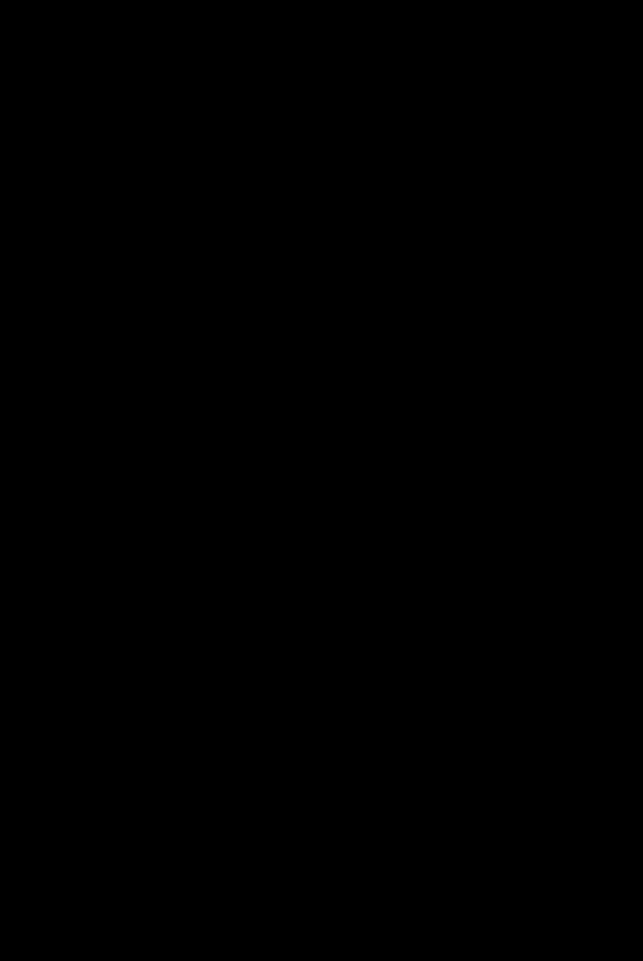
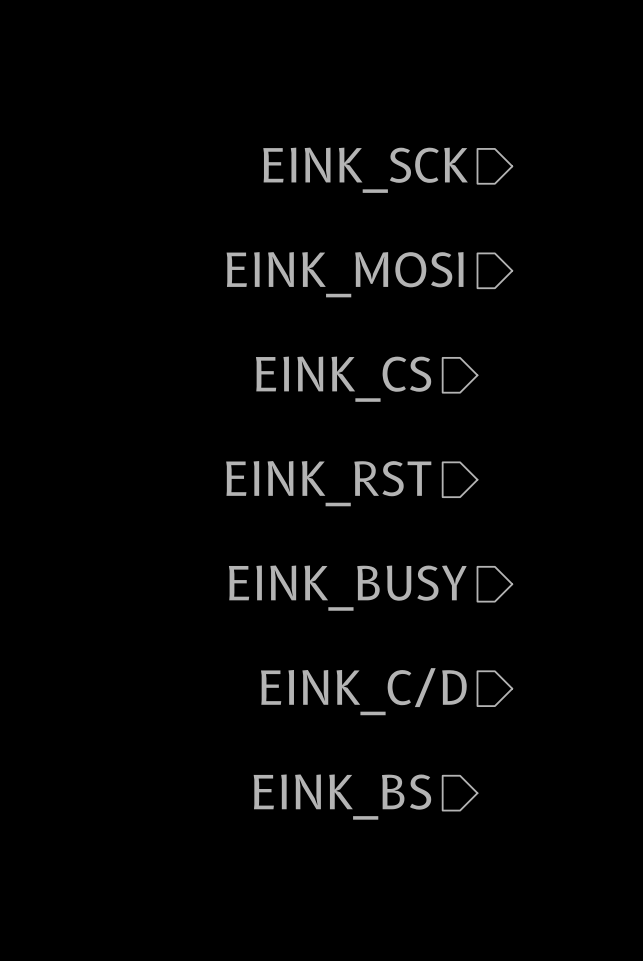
hierarchical label: none -> EINK_SCK (365, 170)
hierarchical label: none -> EINK_MOSI (345, 274)
hierarchical label: none -> EINK_CS (343, 379)
hierarchical label: none -> EINK_RST (328, 483)
hierarchical label: none -> EINK_BUSY (347, 588)
hierarchical label: none -> EINK_C/D (363, 691)
hierarchical label: none -> EINK_BS (342, 797)

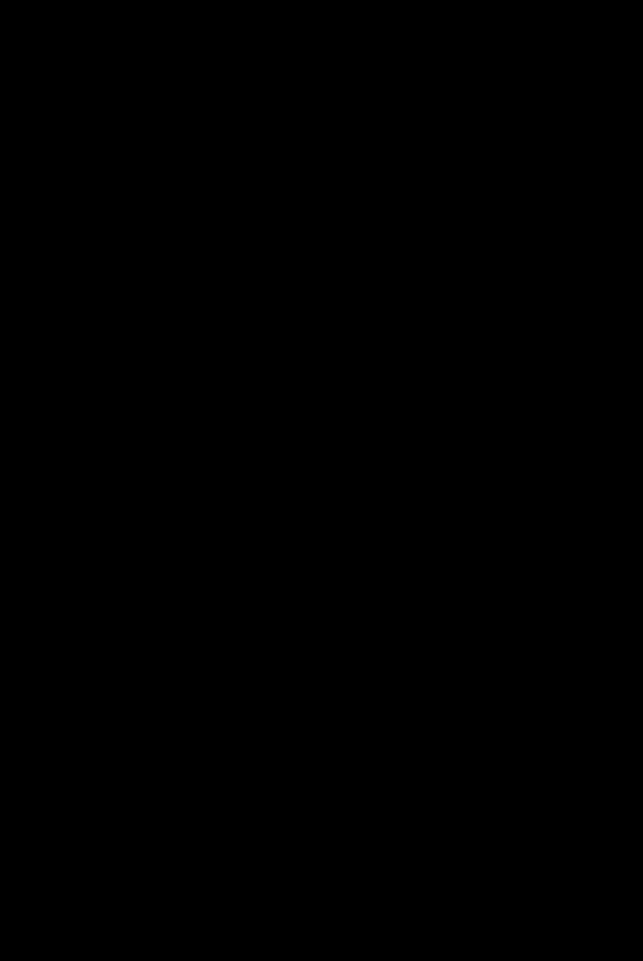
hierarchical label: EINK_SCK (365, 170) -> none
hierarchical label: EINK_MOSI (345, 274) -> none
hierarchical label: EINK_CS (343, 379) -> none
hierarchical label: EINK_RST (328, 483) -> none
hierarchical label: EINK_BUSY (347, 588) -> none
hierarchical label: EINK_C/D (363, 691) -> none
hierarchical label: EINK_BS (342, 797) -> none

